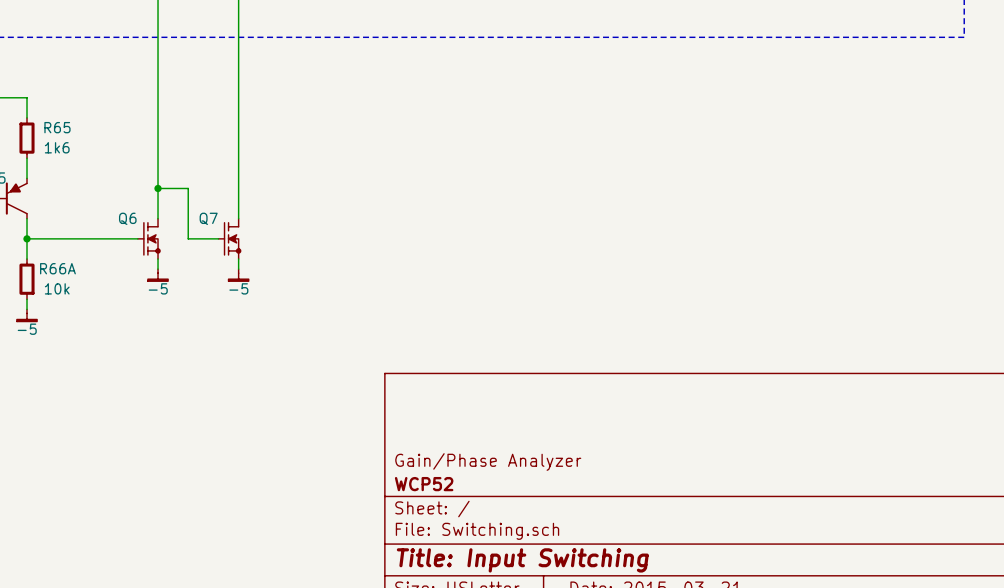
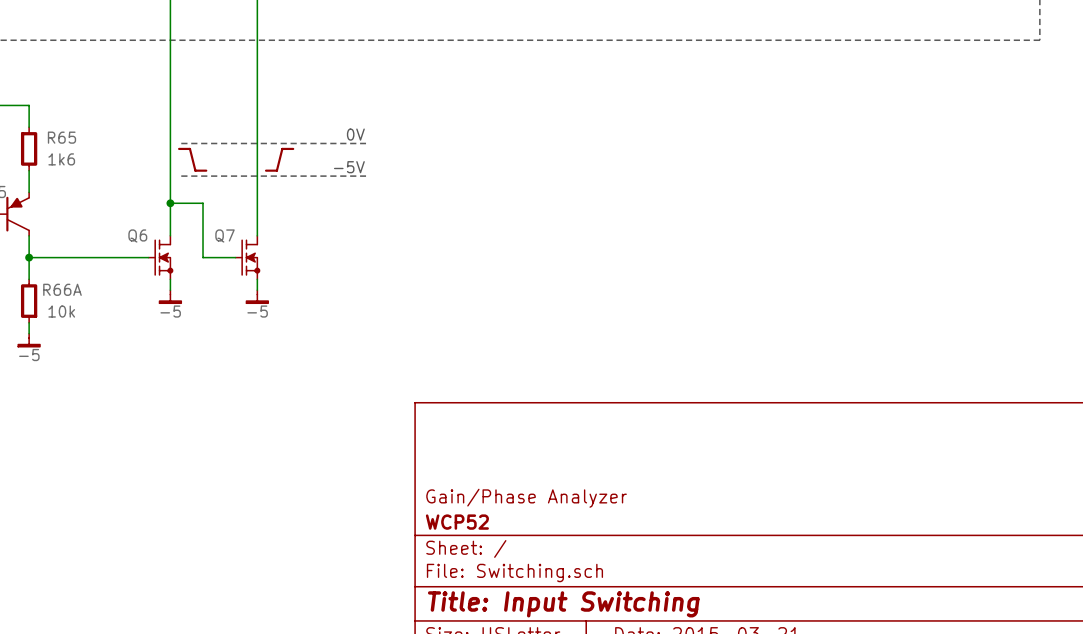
text: none -> 0V (355, 134)
line: none -> (181, 143) (366, 143)
power symbol: none -> (192, 159)
power symbol: none -> (279, 159)
text: none -> -5V (349, 167)
line: none -> (181, 176) (366, 176)

